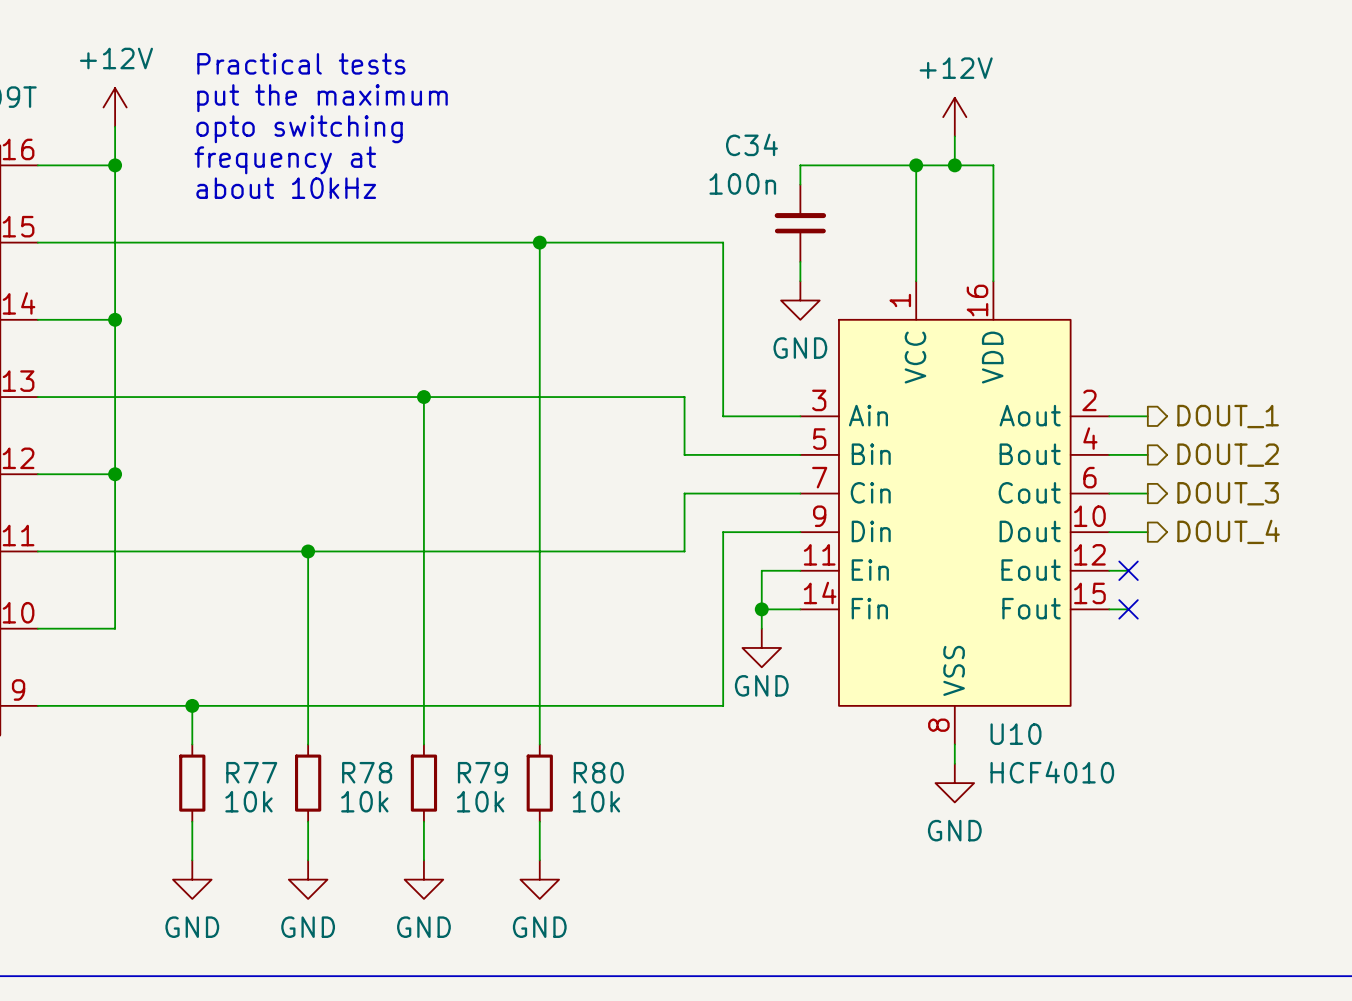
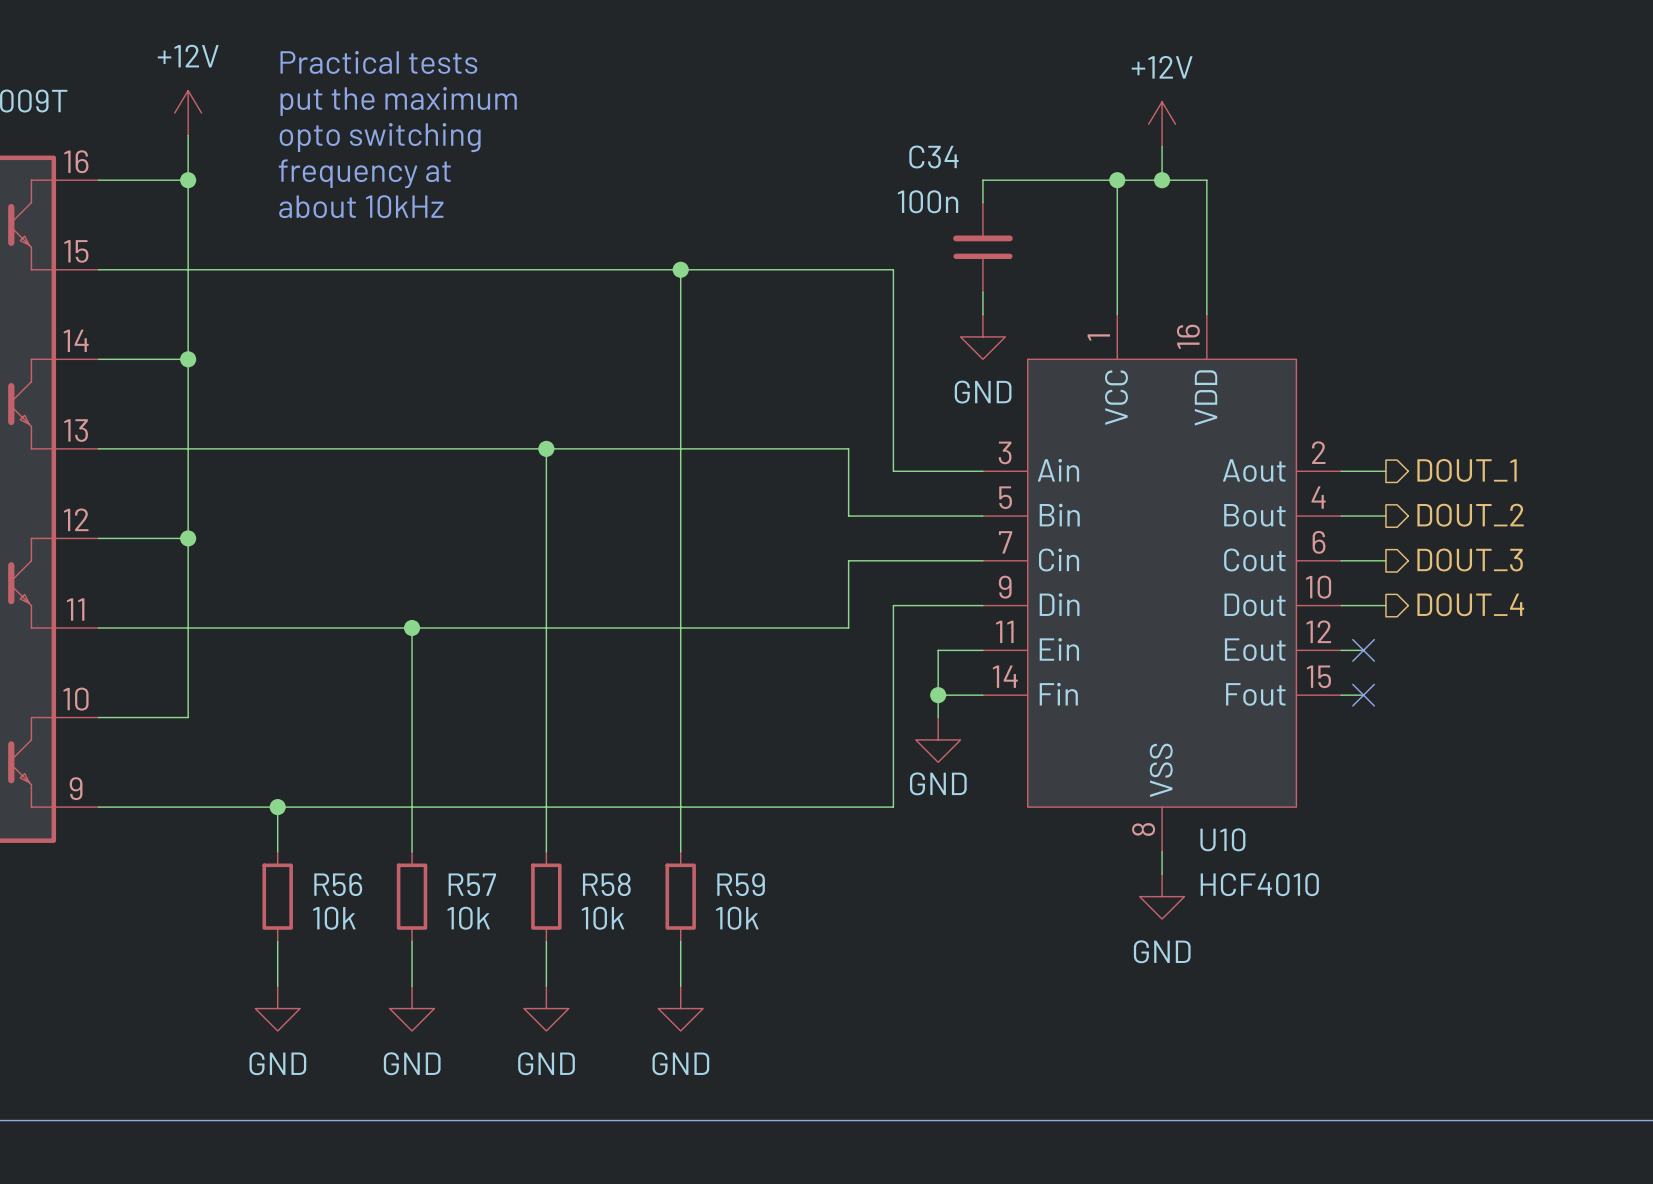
R77 name: R77 (251, 772) -> R56 (338, 884)
R78 name: R78 (367, 772) -> R57 (472, 884)
R79 name: R79 (482, 772) -> R58 (606, 884)
R80 name: R80 (598, 772) -> R59 (741, 884)

